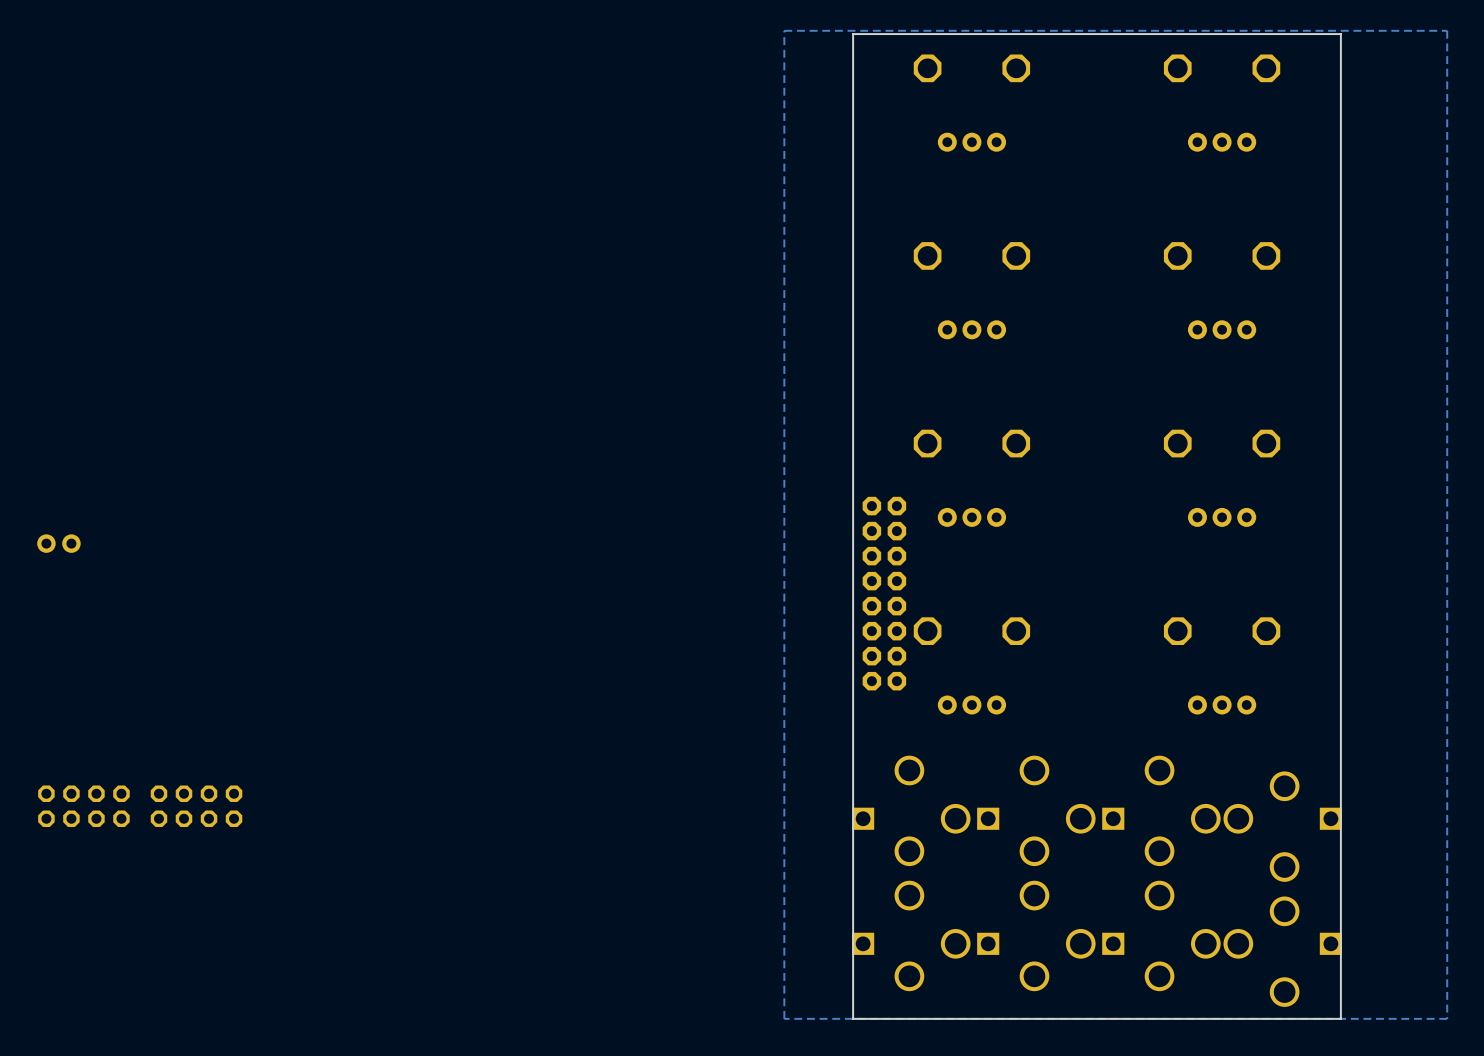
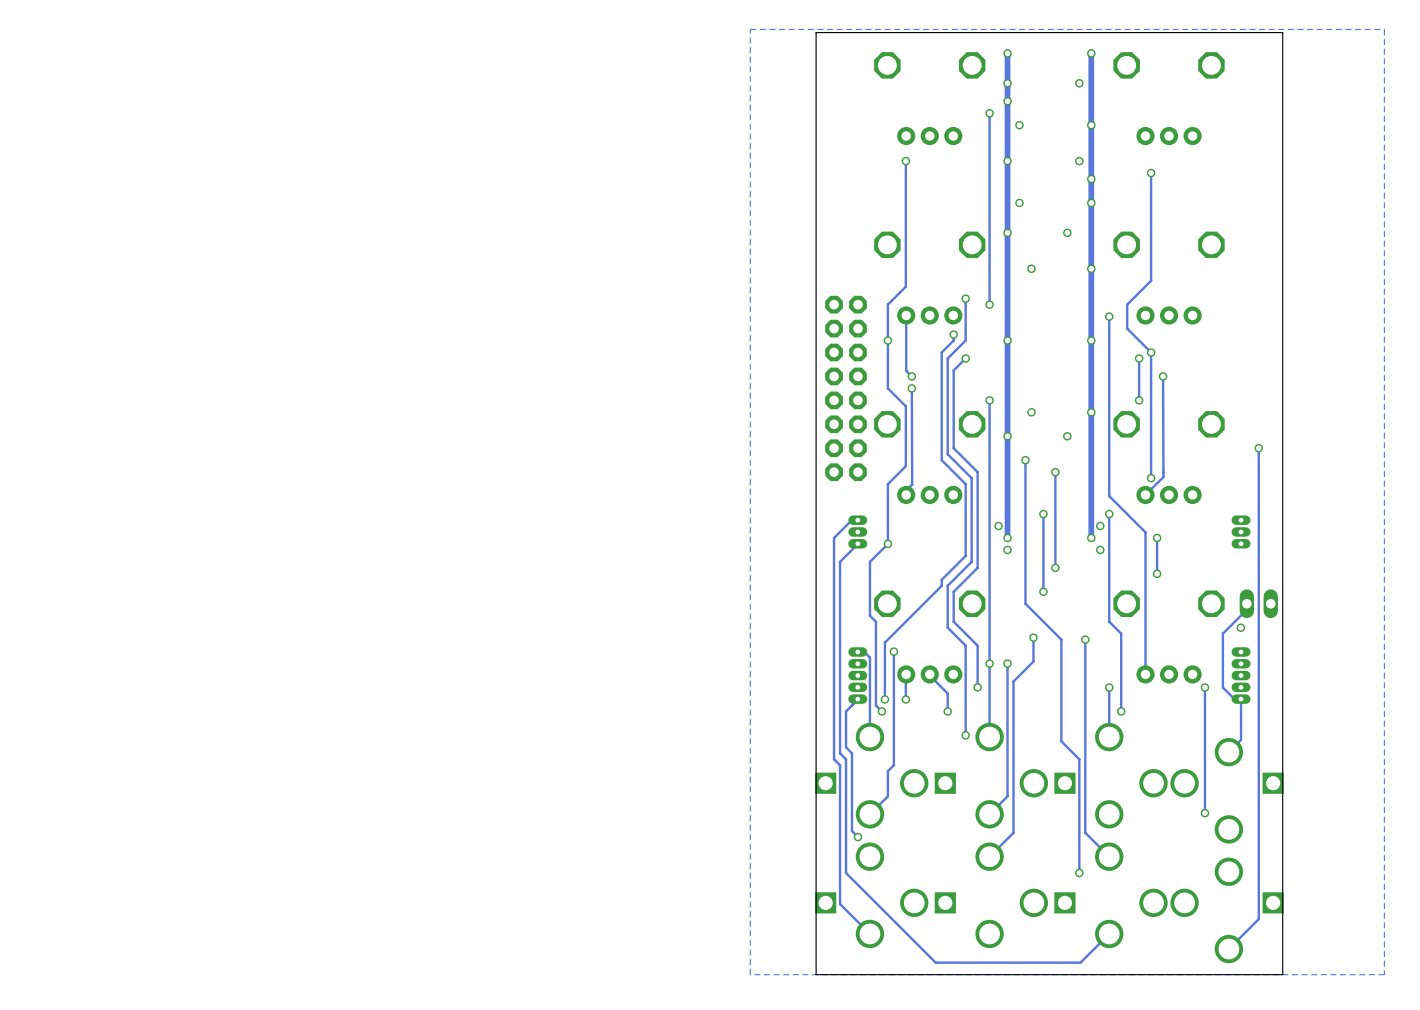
track: none -> (1007, 53) (1007, 537)
via: none -> (1007, 53)
track: none -> (1091, 53) (1091, 537)
via: none -> (1091, 53)
via: none -> (1007, 83)
via: none -> (1079, 83)
via: none -> (1007, 101)
track: none -> (989, 113) (989, 304)
via: none -> (989, 113)
via: none -> (1019, 125)
via: none -> (1091, 125)
track: none -> (905, 161) (905, 286) (887, 304) (887, 388) (905, 406) (905, 466) (887, 484) (887, 543) (869, 561) (869, 615) (875, 621) (875, 705) (881, 711)
via: none -> (905, 161)
via: none -> (1007, 161)
via: none -> (1079, 161)
track: none -> (1151, 173) (1151, 280) (1127, 304) (1127, 328) (1151, 352) (1151, 478)
via: none -> (1151, 173)
via: none -> (1091, 179)
via: none -> (1019, 202)
via: none -> (1091, 202)
via: none -> (1007, 232)
via: none -> (1067, 232)
via: none -> (1031, 268)
via: none -> (1091, 268)
track: none -> (965, 298) (965, 340) (947, 358) (947, 454) (971, 478) (971, 561) (947, 585) (947, 627) (965, 645) (965, 735)
via: none -> (965, 298)
via: none -> (989, 304)
track: none -> (906, 315) (906, 370) (911, 376)
track: none -> (1109, 316) (1109, 496) (1145, 532) (1145, 674)
via: none -> (1109, 316)
track: none -> (953, 334) (953, 340) (941, 352) (941, 460) (965, 484) (965, 555) (941, 579) (941, 585) (884, 642) (884, 699)
via: none -> (953, 334)
via: none -> (887, 340)
via: none -> (1007, 340)
via: none -> (1091, 340)
via: none -> (1151, 352)
track: none -> (965, 358) (953, 370) (953, 448) (977, 472) (977, 567) (953, 591) (953, 621) (977, 645) (977, 687)
via: none -> (965, 358)
track: none -> (1139, 358) (1139, 400)
via: none -> (1139, 358)
via: none -> (911, 376)
track: none -> (1163, 376) (1163, 477) (1145, 494)
via: none -> (1163, 376)
track: none -> (911, 388) (912, 484) (906, 490) (906, 494)
via: none -> (911, 388)
track: none -> (989, 400) (989, 737)
via: none -> (989, 400)
via: none -> (1139, 400)
via: none -> (1031, 412)
via: none -> (1091, 412)
via: none -> (1007, 436)
via: none -> (1067, 436)
track: none -> (1258, 448) (1258, 919) (1228, 949)
via: none -> (1258, 448)
track: none -> (1025, 460) (1025, 603) (1061, 639) (1061, 741) (1079, 759) (1079, 872)
via: none -> (1025, 460)
track: none -> (1055, 472) (1055, 567)
via: none -> (1055, 472)
via: none -> (1151, 478)
track: none -> (1043, 514) (1043, 591)
via: none -> (1043, 514)
track: none -> (1109, 514) (1109, 621) (1121, 633) (1121, 711)
via: none -> (1109, 514)
part: (58, 543) -> none
track: none -> (857, 520) (851, 520) (834, 537) (834, 759) (840, 765) (840, 904) (869, 933)
via: none -> (998, 525)
via: none -> (1100, 525)
part: none -> (857, 531)
part: none -> (1241, 531)
via: none -> (1007, 537)
via: none -> (1091, 537)
track: none -> (1157, 537) (1157, 573)
via: none -> (1157, 537)
track: none -> (857, 543) (840, 561) (840, 753) (846, 759) (846, 872) (935, 962) (1080, 962) (1109, 933)
via: none -> (887, 543)
via: none -> (1007, 549)
via: none -> (1100, 549)
part position: (884, 593) -> (846, 388)
via: none -> (1055, 567)
via: none -> (1157, 573)
via: none -> (1043, 591)
track: none -> (1246, 603) (1246, 609) (1222, 633) (1222, 687) (1234, 699) (1241, 699) (1241, 739) (1228, 752)
part: none -> (1258, 603)
via: none -> (1240, 627)
track: none -> (1033, 637) (1033, 661) (1013, 681) (1013, 832) (989, 856)
via: none -> (1033, 637)
track: none -> (1085, 639) (1085, 832) (1109, 856)
via: none -> (1085, 639)
track: none -> (857, 651) (864, 651) (869, 657) (869, 737)
track: none -> (893, 651) (893, 765) (887, 771) (887, 796) (869, 814)
via: none -> (893, 651)
via: none -> (989, 663)
track: none -> (1007, 663) (1007, 796) (989, 814)
via: none -> (1007, 663)
track: none -> (906, 674) (905, 699)
track: none -> (929, 674) (947, 693) (947, 711)
part: none -> (857, 675)
part: none -> (1241, 675)
via: none -> (977, 687)
track: none -> (1109, 687) (1109, 737)
via: none -> (1109, 687)
track: none -> (1204, 687) (1204, 813)
via: none -> (1204, 687)
via: none -> (884, 699)
via: none -> (905, 699)
track: none -> (852, 705) (852, 704) (857, 699) (857, 699) (846, 711) (846, 747) (852, 753) (852, 831) (857, 837)
via: none -> (881, 711)
via: none -> (947, 711)
via: none -> (1121, 711)
via: none -> (965, 735)
part: (83, 806) -> none
part: (196, 806) -> none
via: none -> (1204, 813)
via: none -> (857, 837)
via: none -> (1079, 872)

